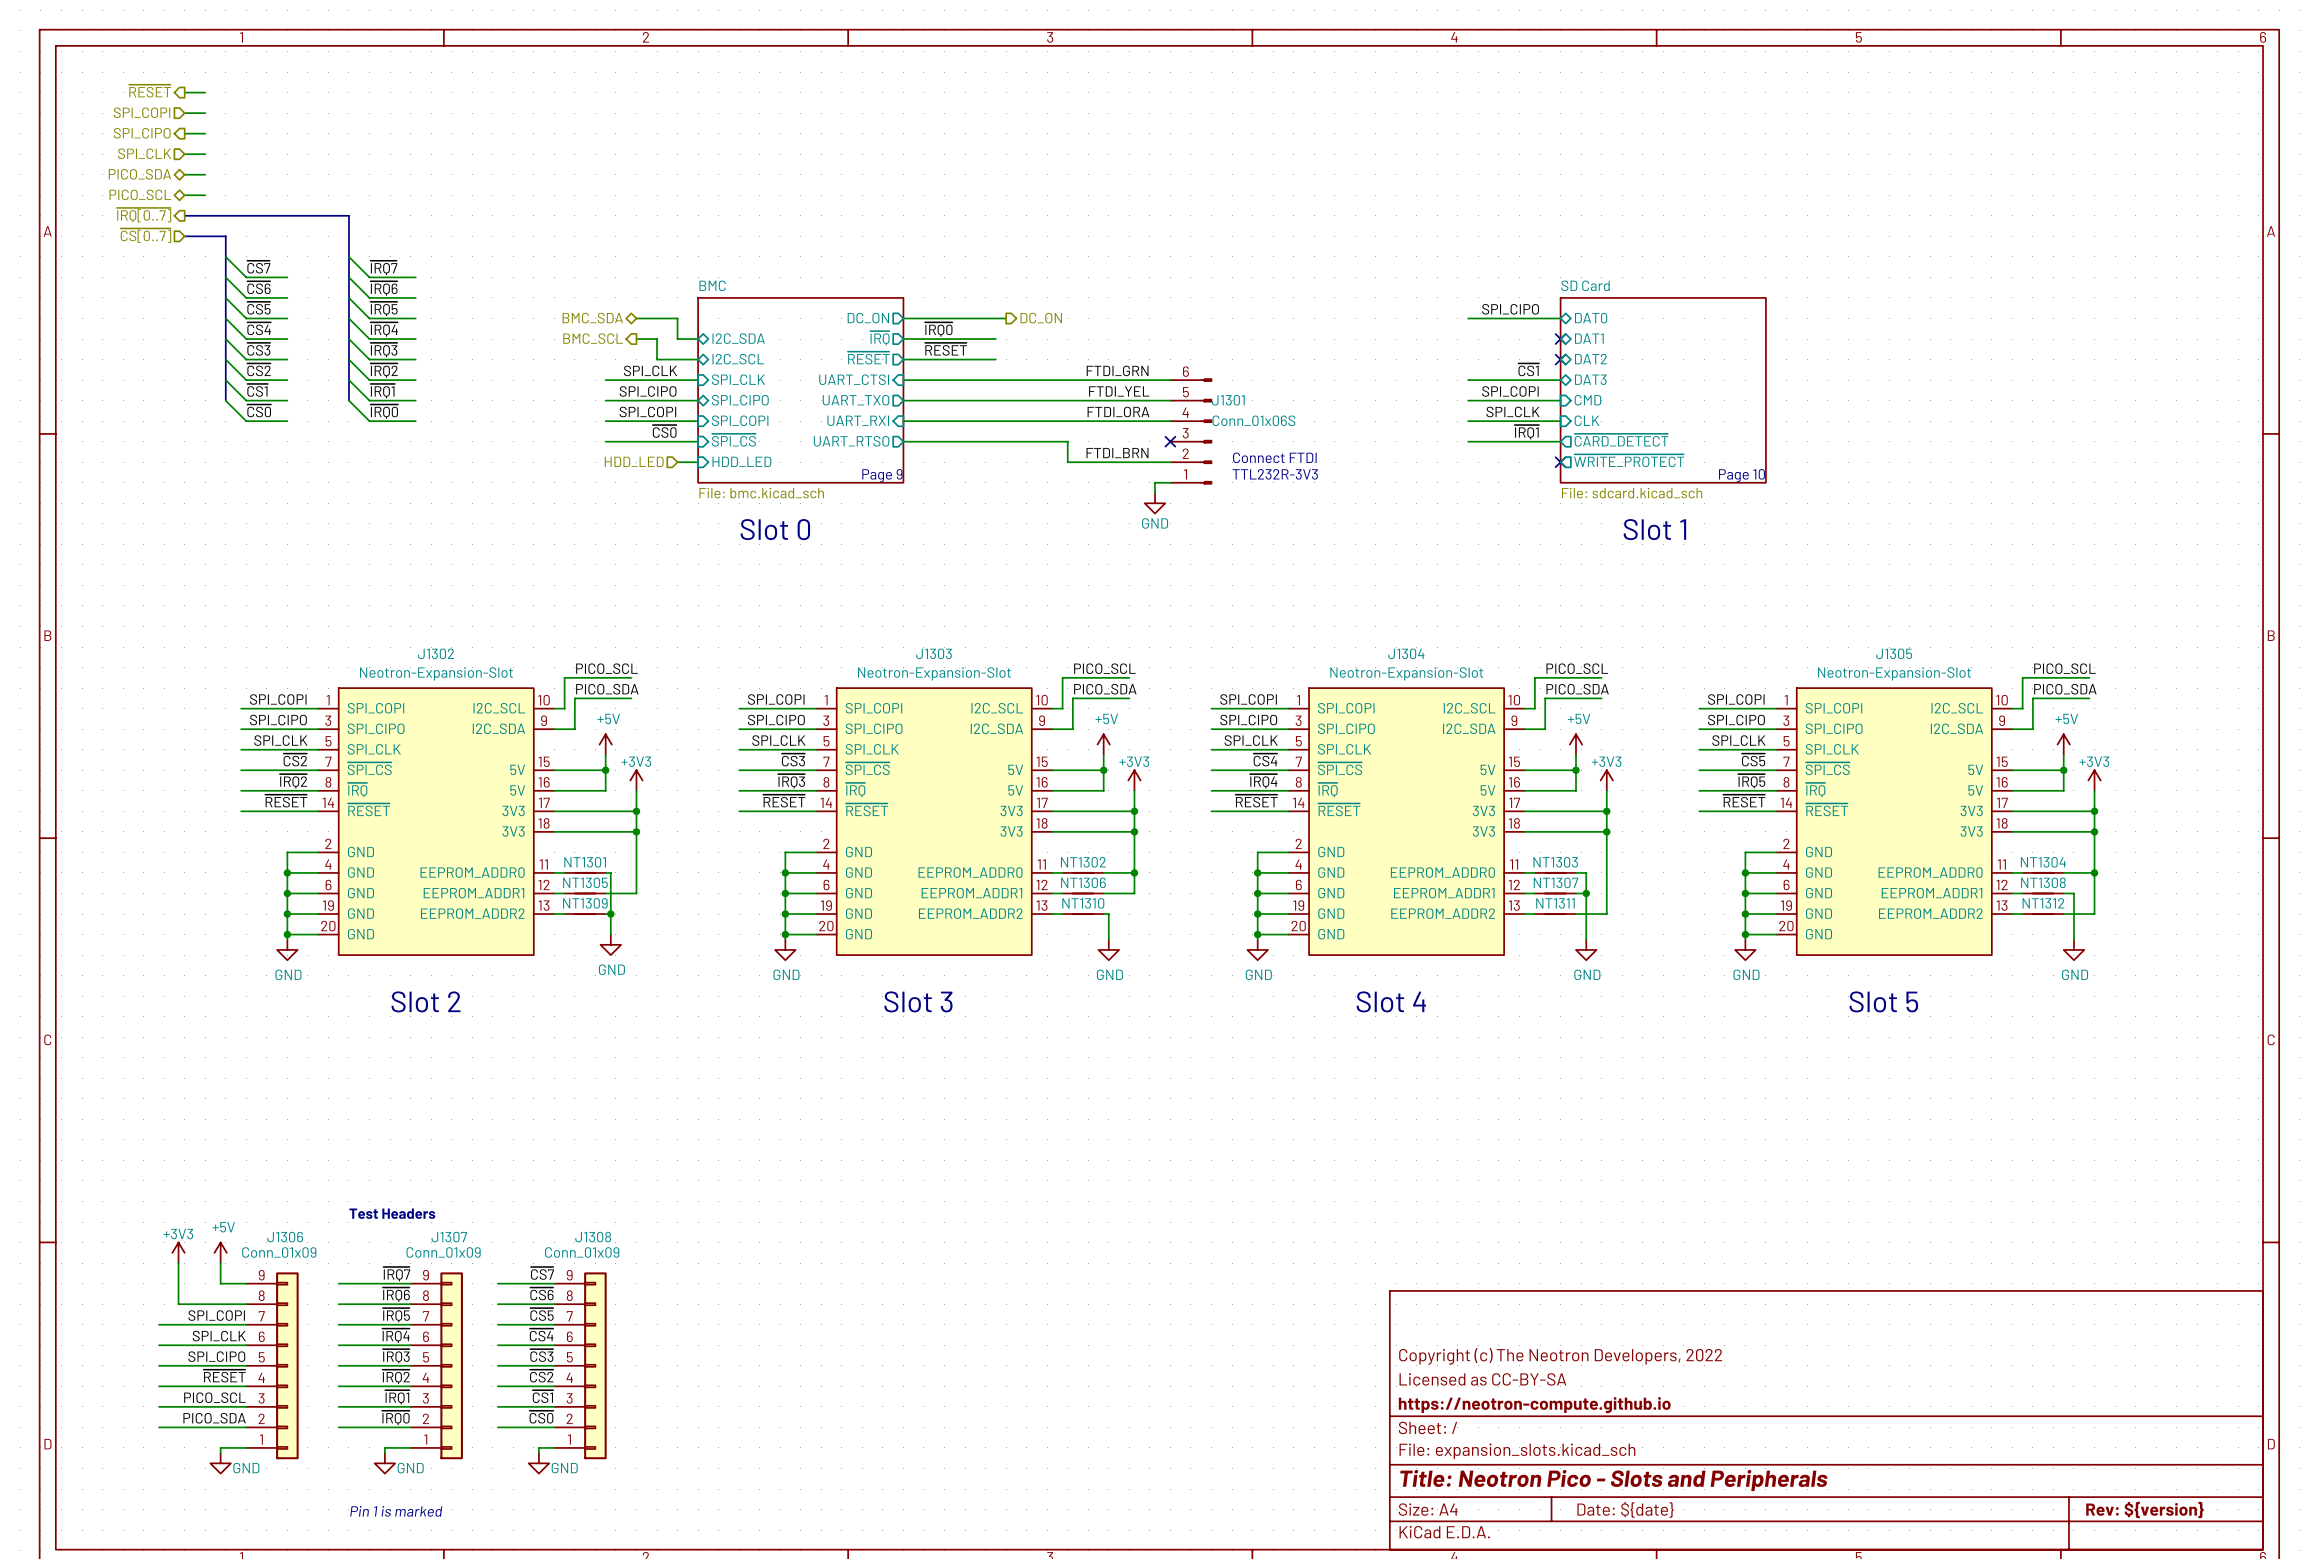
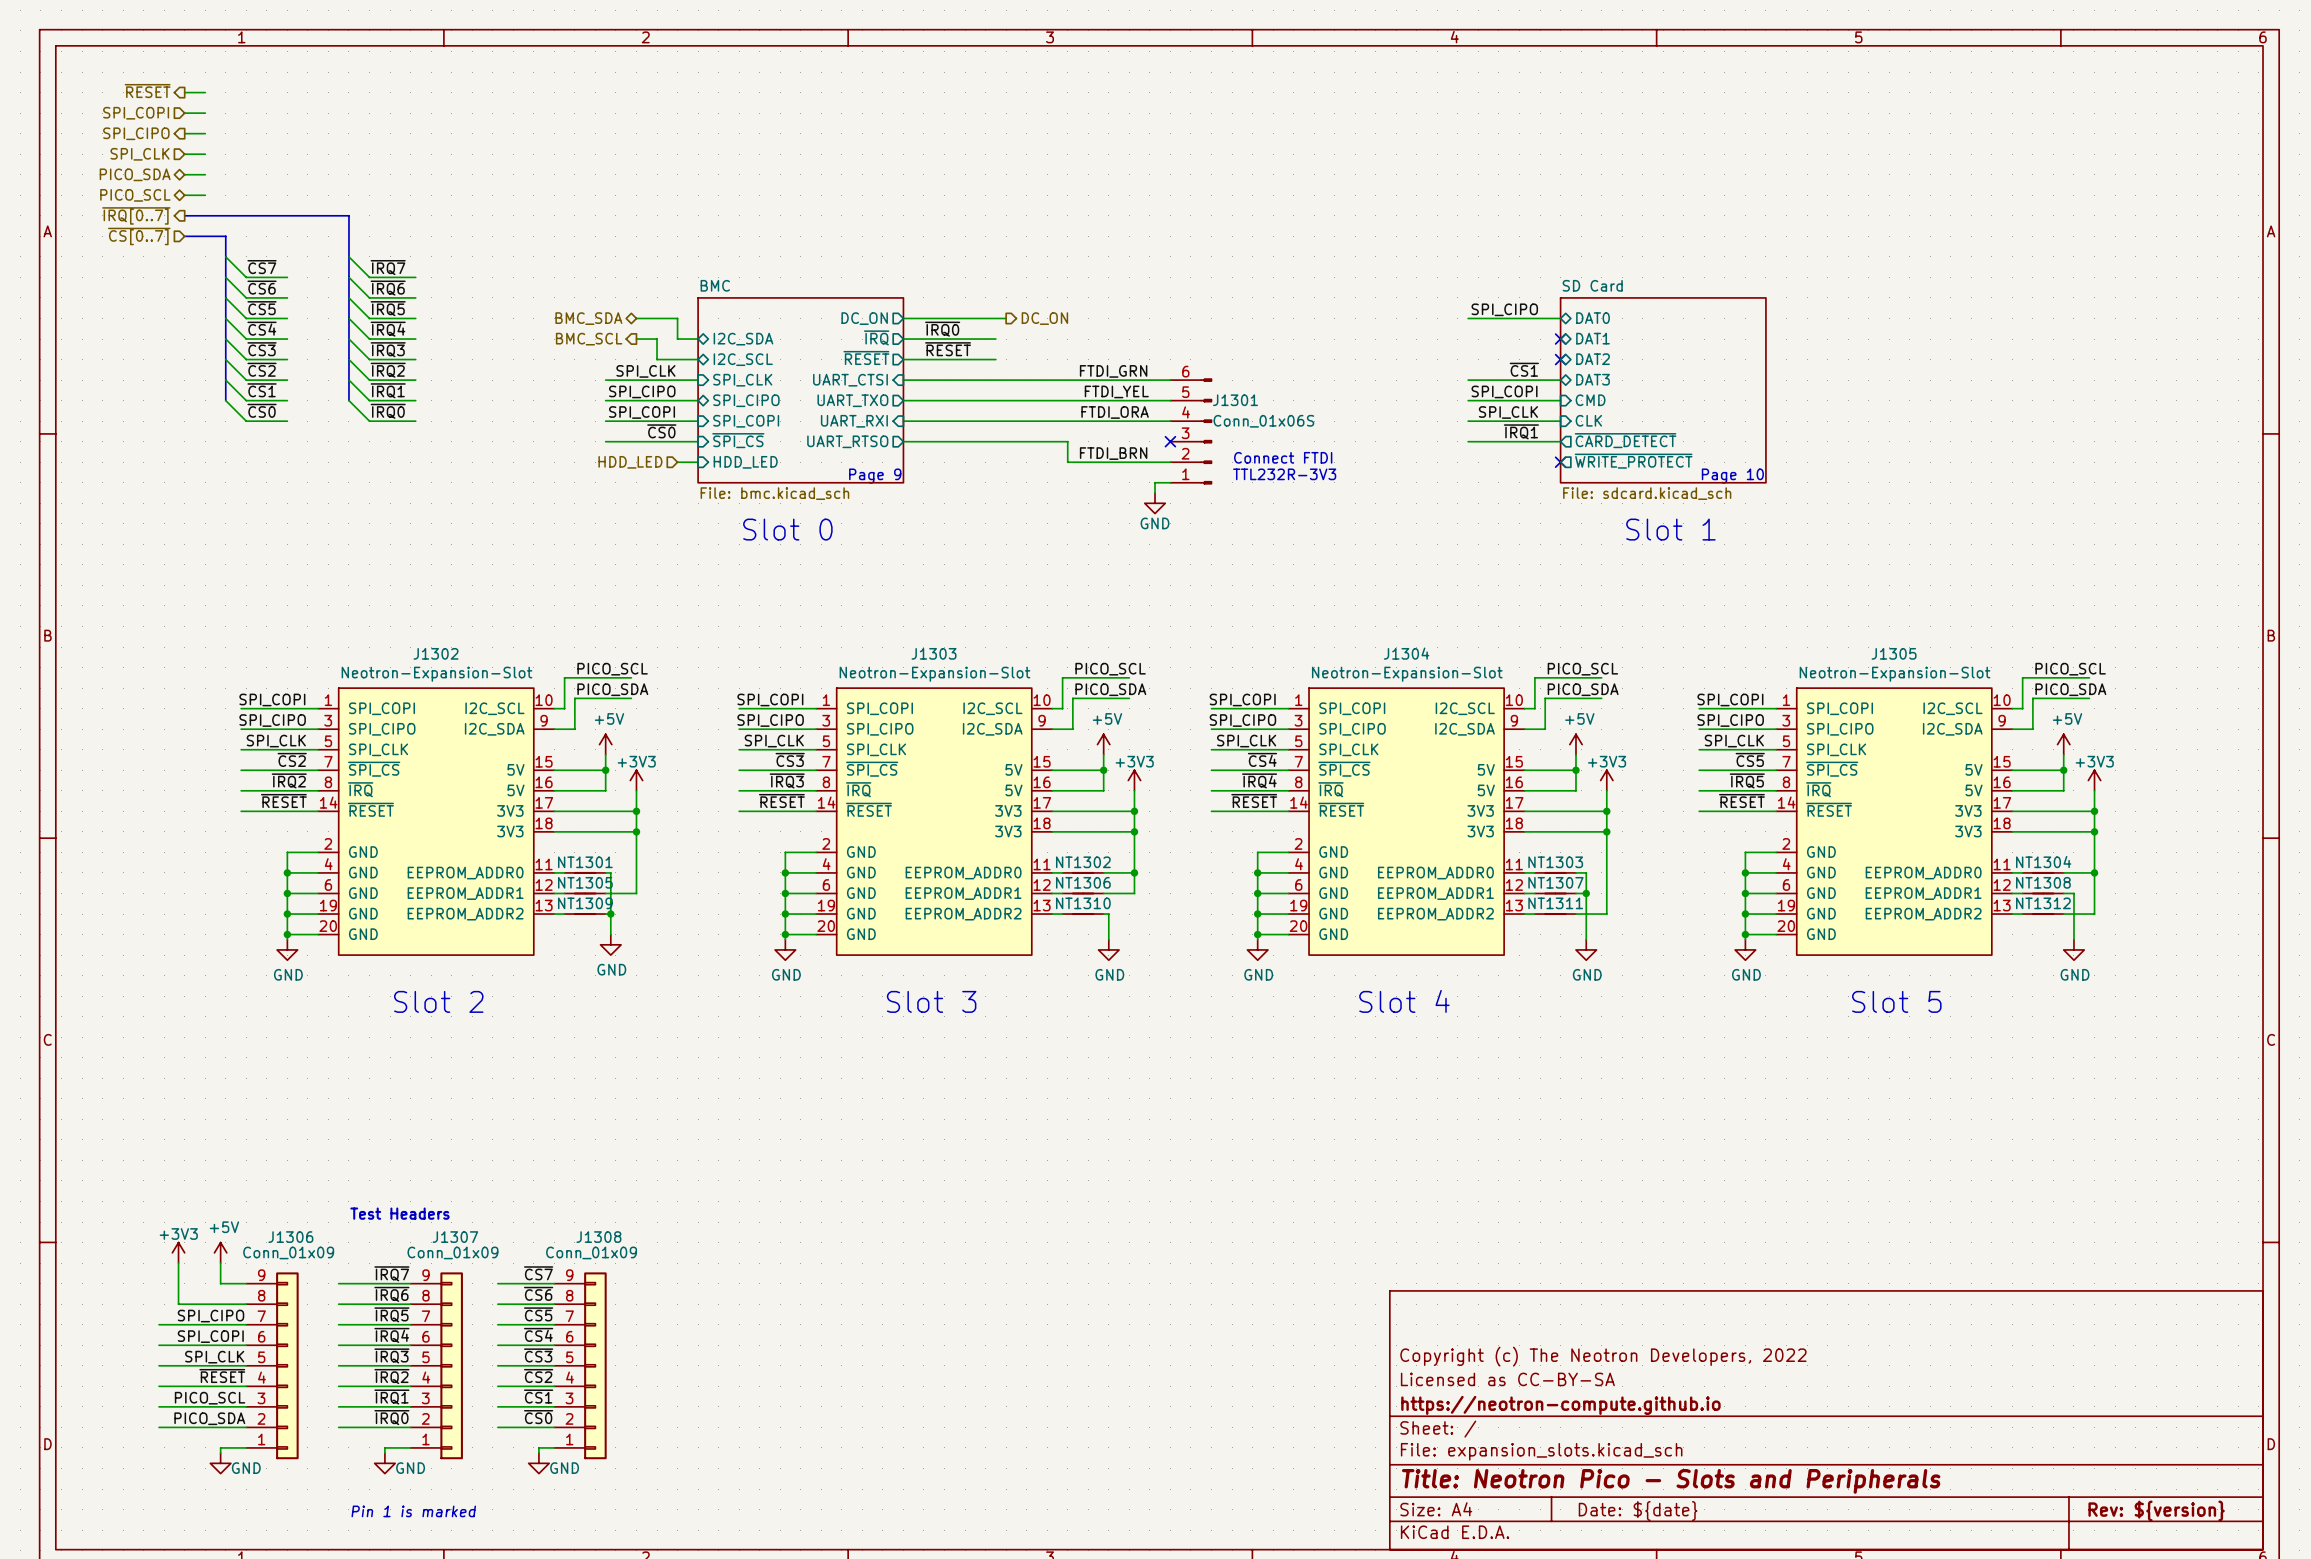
label: SPI_COPI (216, 1315) -> SPI_CIPO (211, 1316)
label: SPI_CLK (219, 1336) -> SPI_COPI (210, 1336)
label: SPI_CIPO (216, 1356) -> SPI_CLK (214, 1357)

